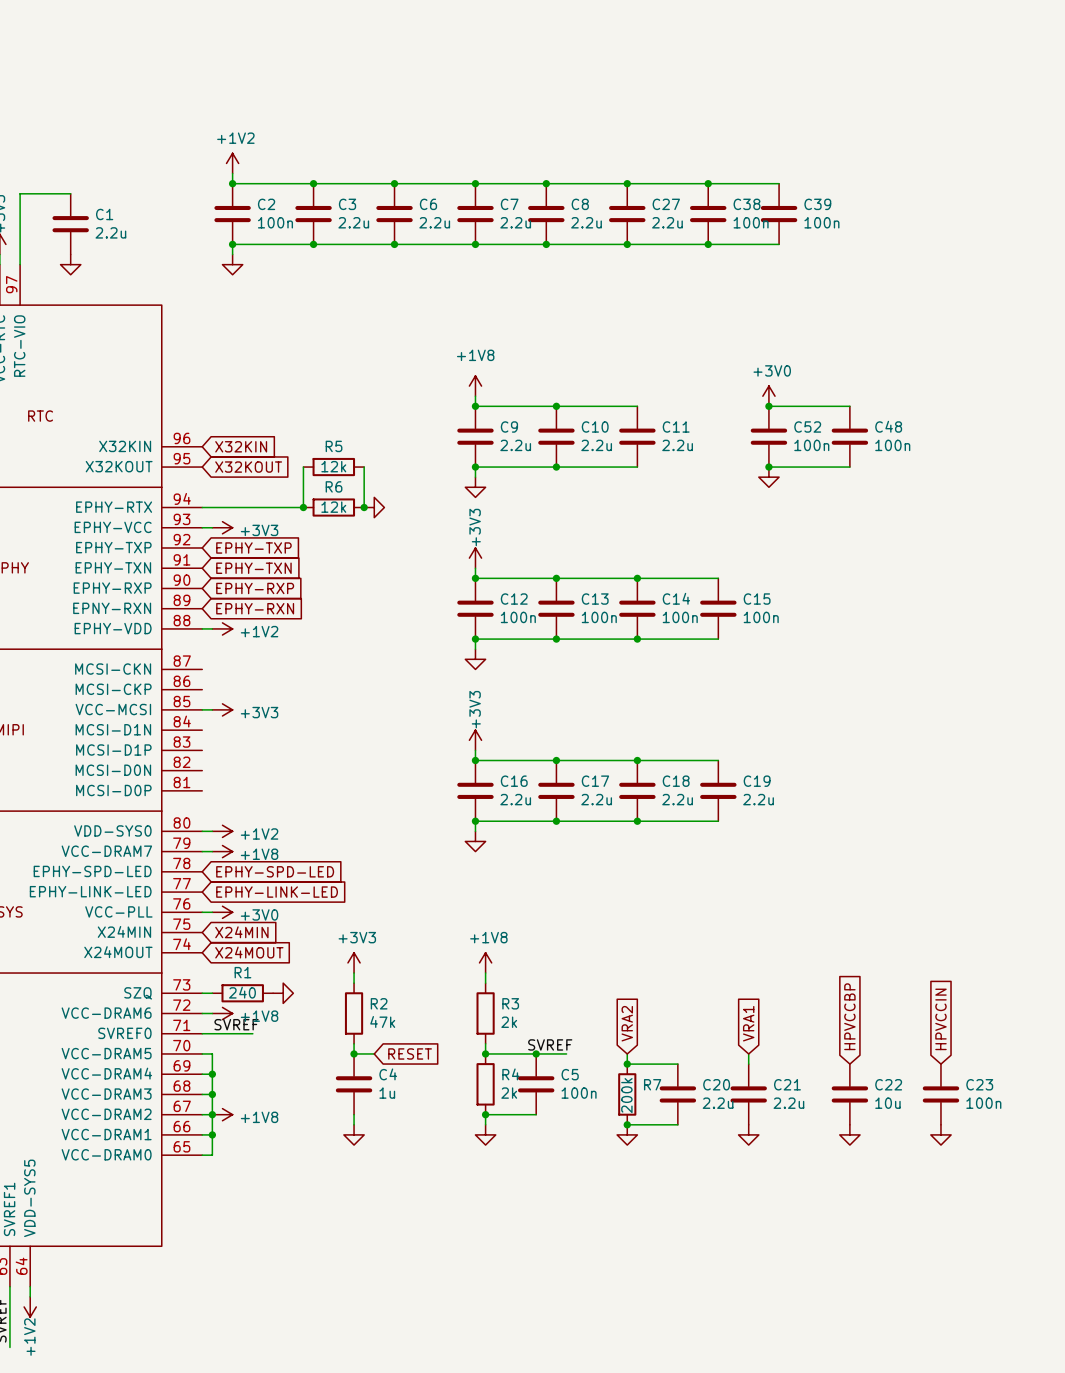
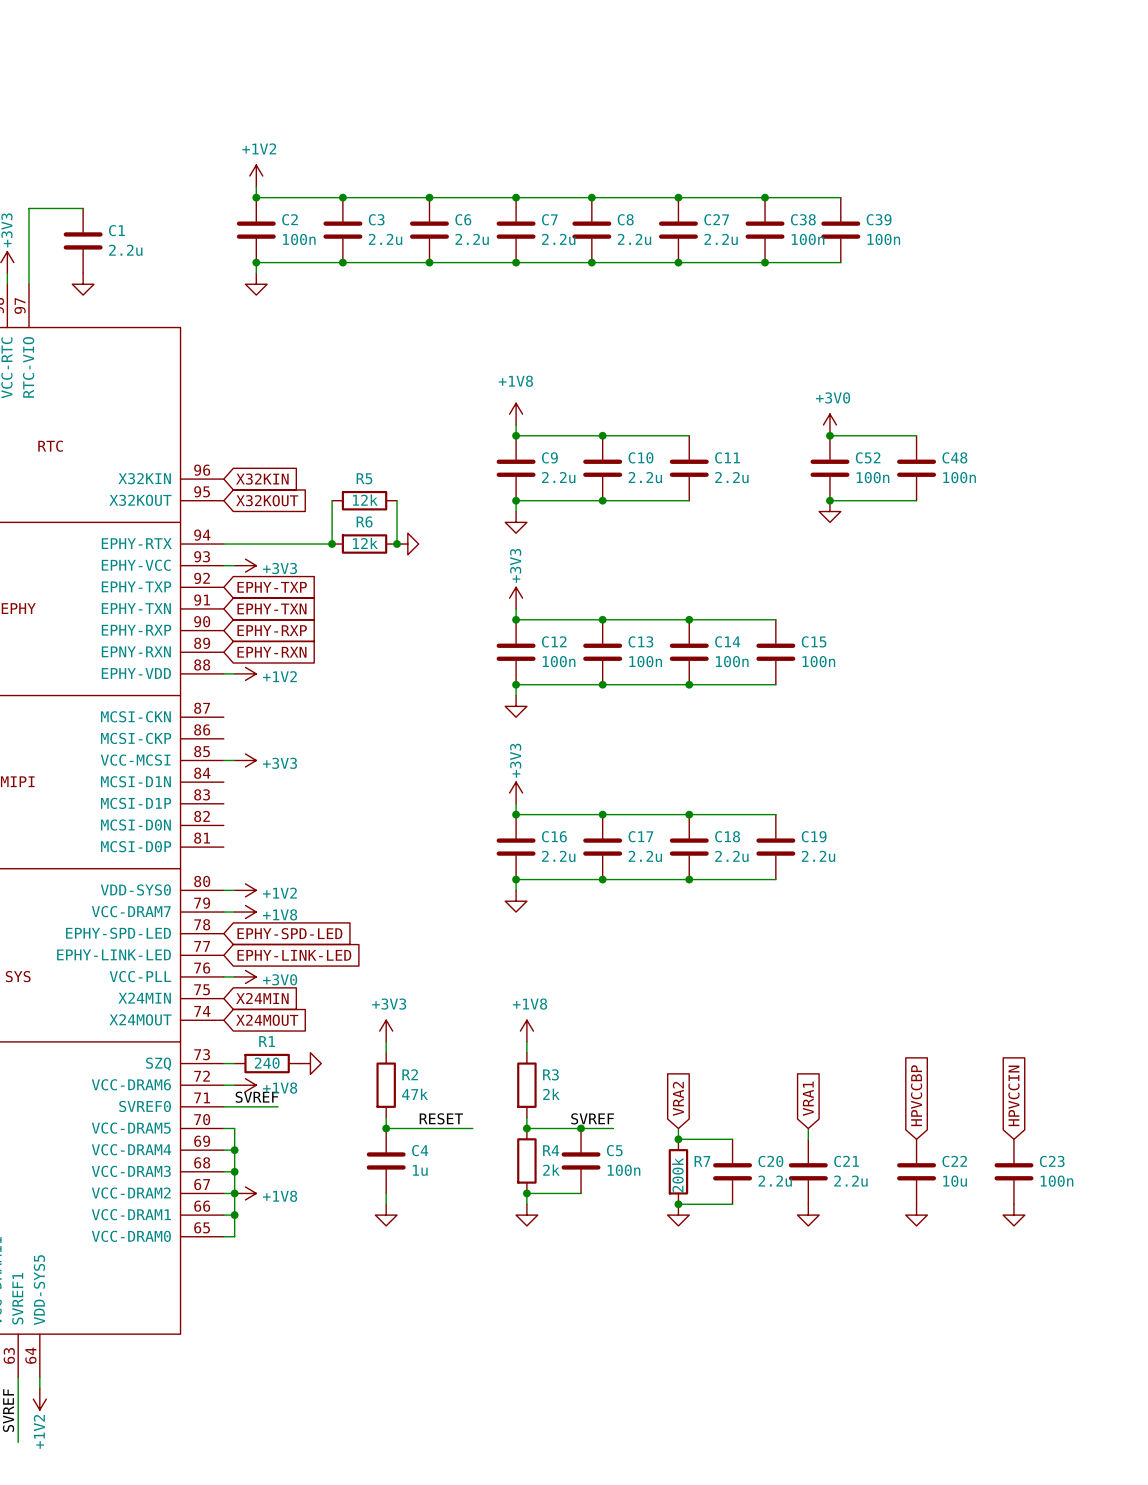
label: none -> RESET (441, 1118)
wire: none -> (407, 1128) (472, 1128)
global label: RESET (410, 1053) -> none

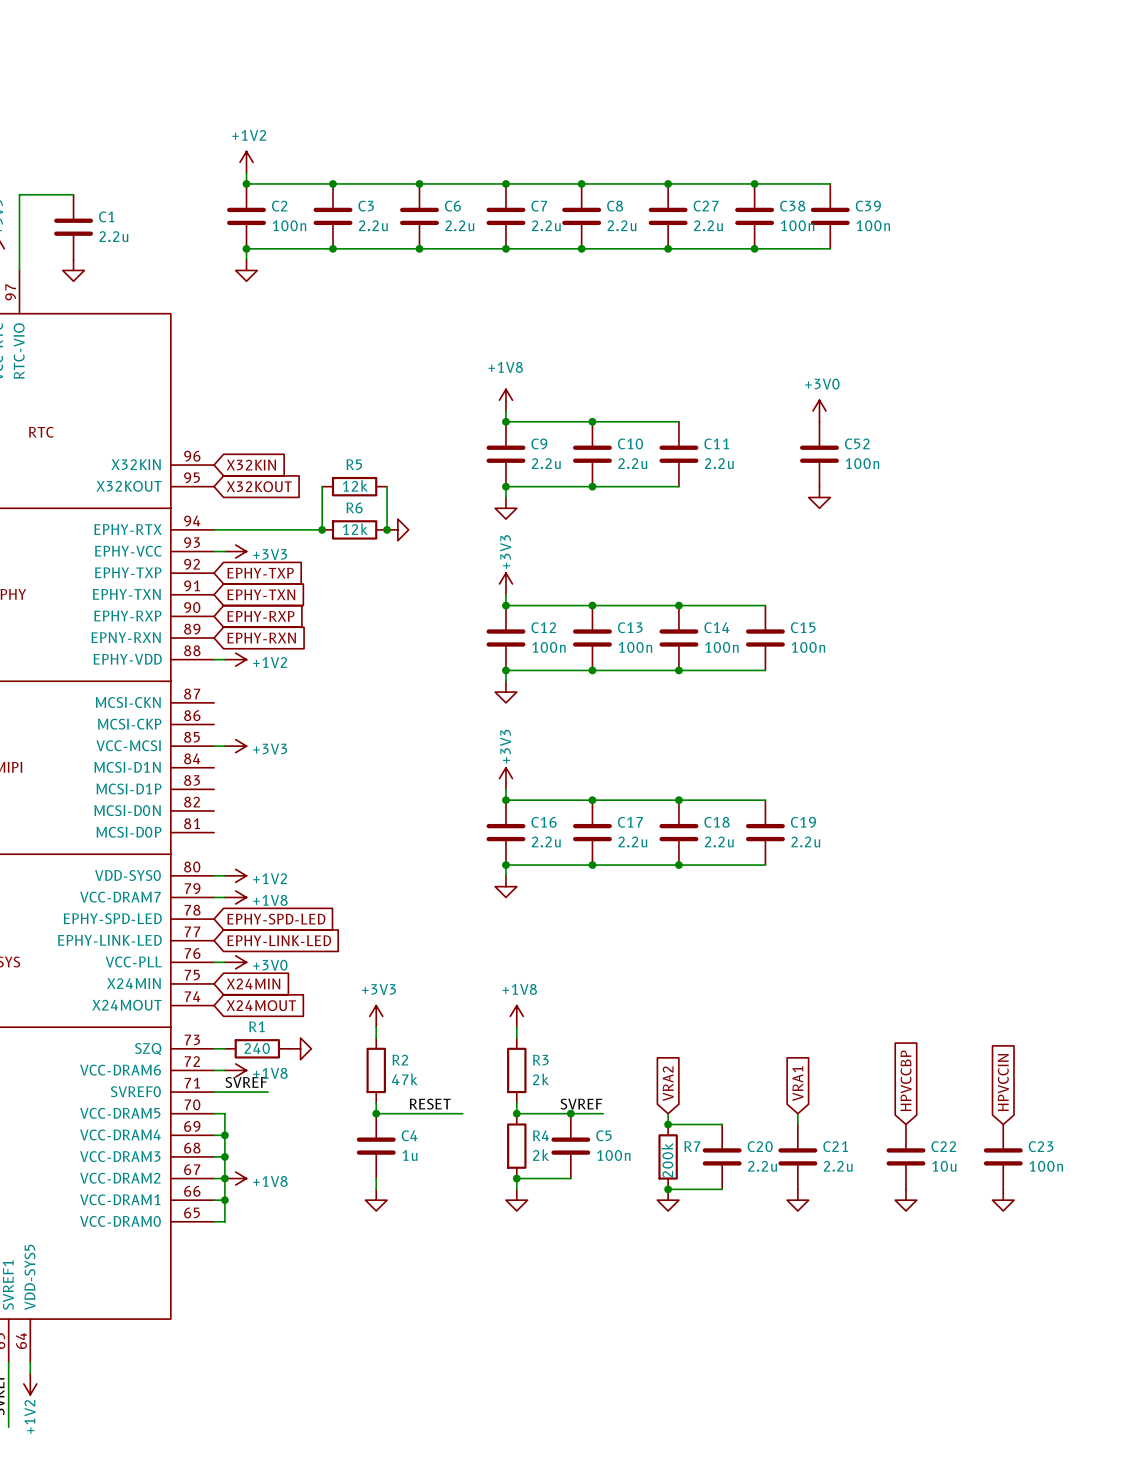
wire: (829, 435) (916, 435) -> none
junction: (829, 435) -> none
C48: 100n (916, 468) -> none
wire: (829, 500) (916, 500) -> none
junction: (829, 500) -> none

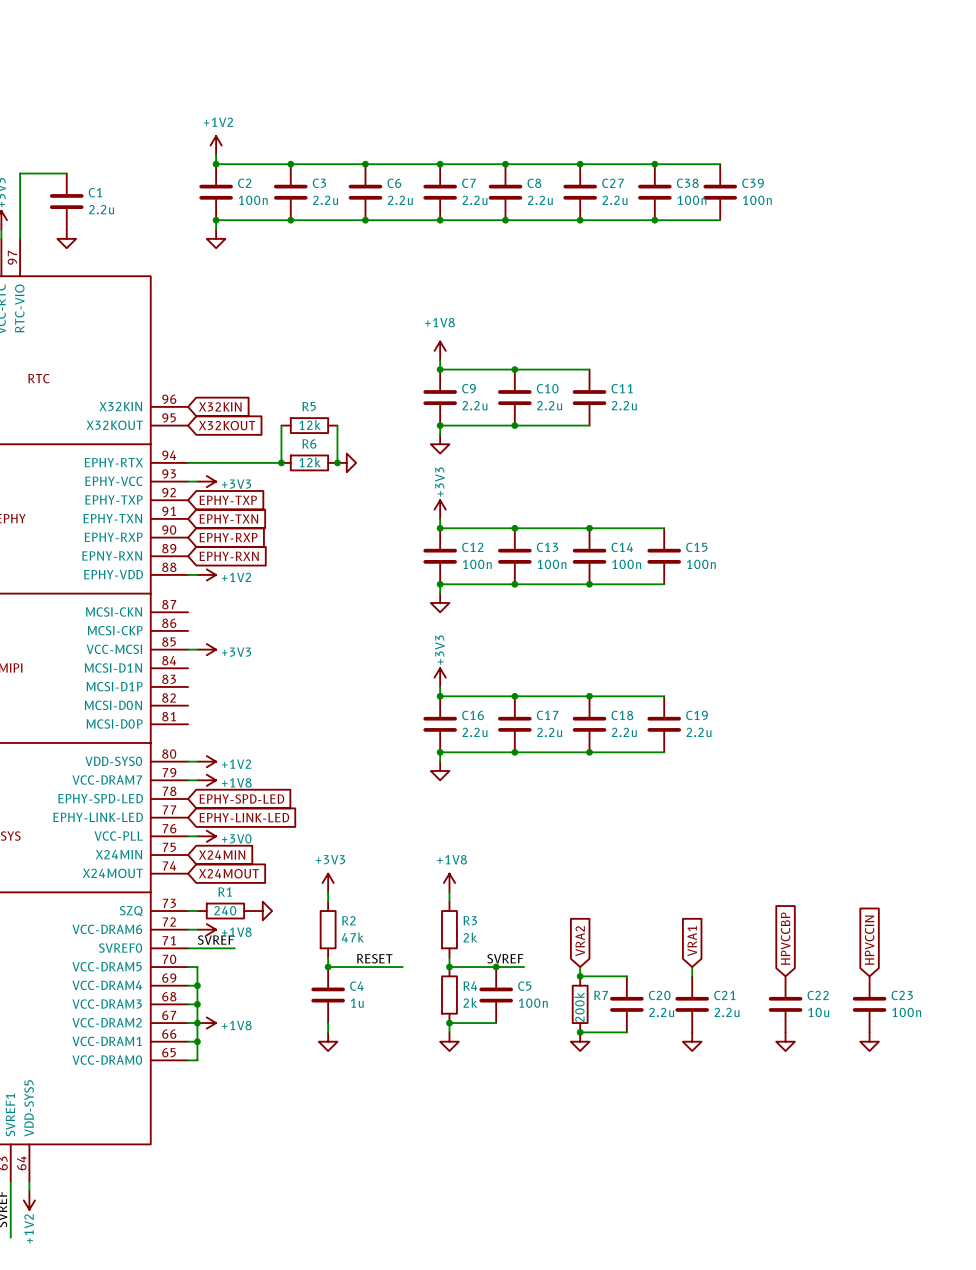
power symbol: +3V0 (819, 410) -> none
C52: 100n (819, 454) -> none
power symbol: (819, 497) -> none

